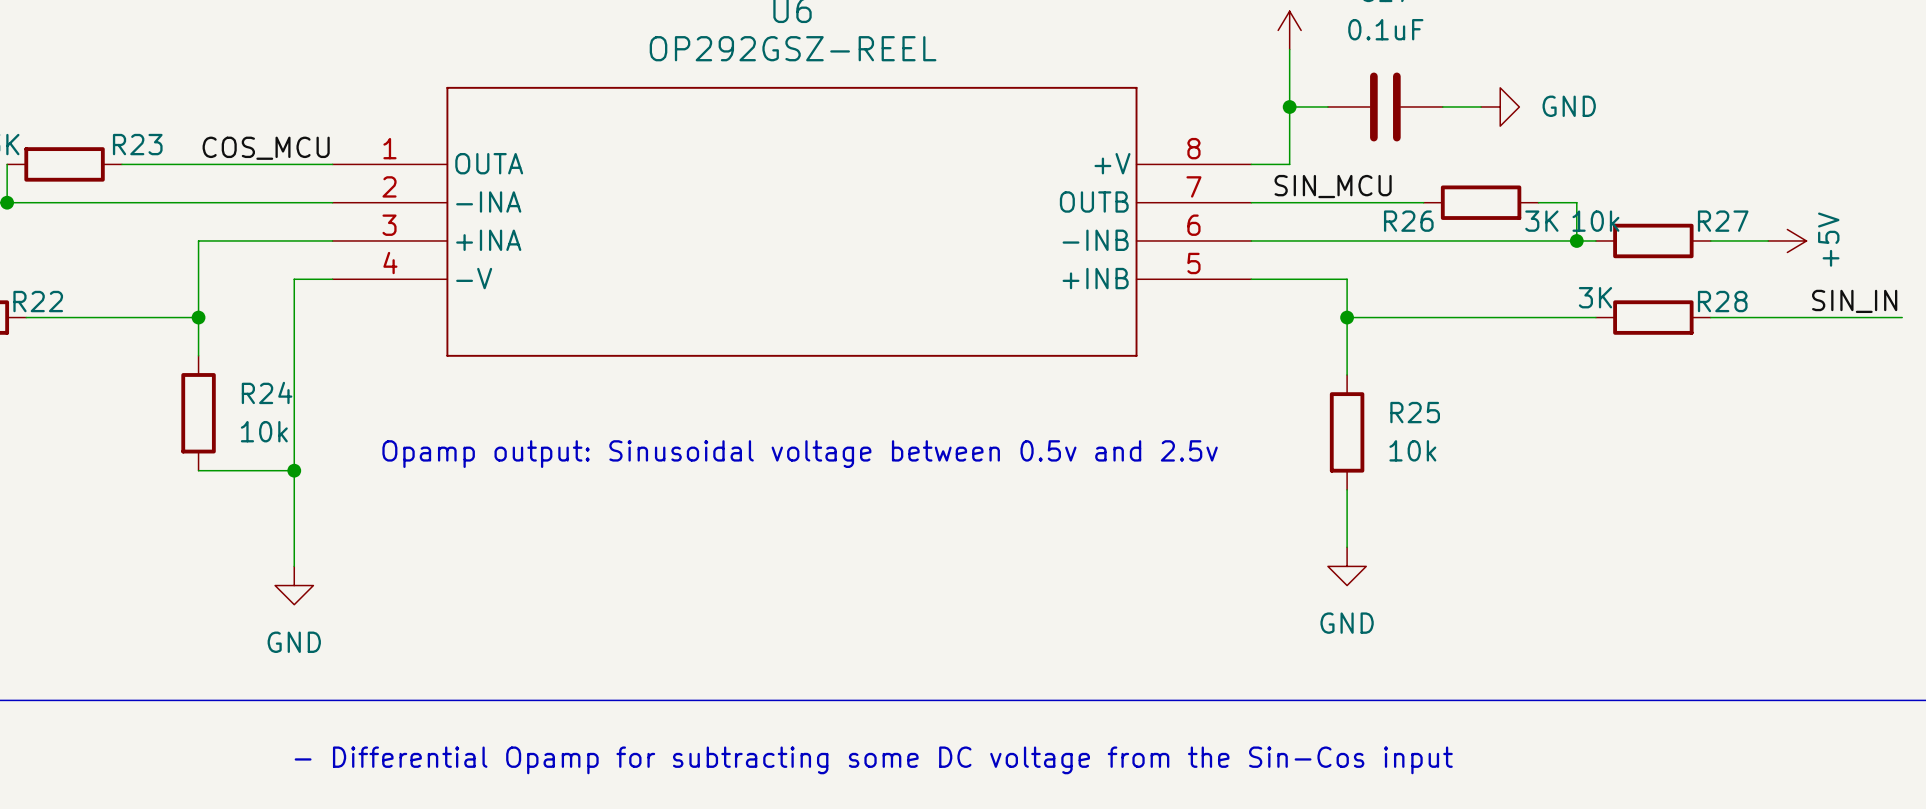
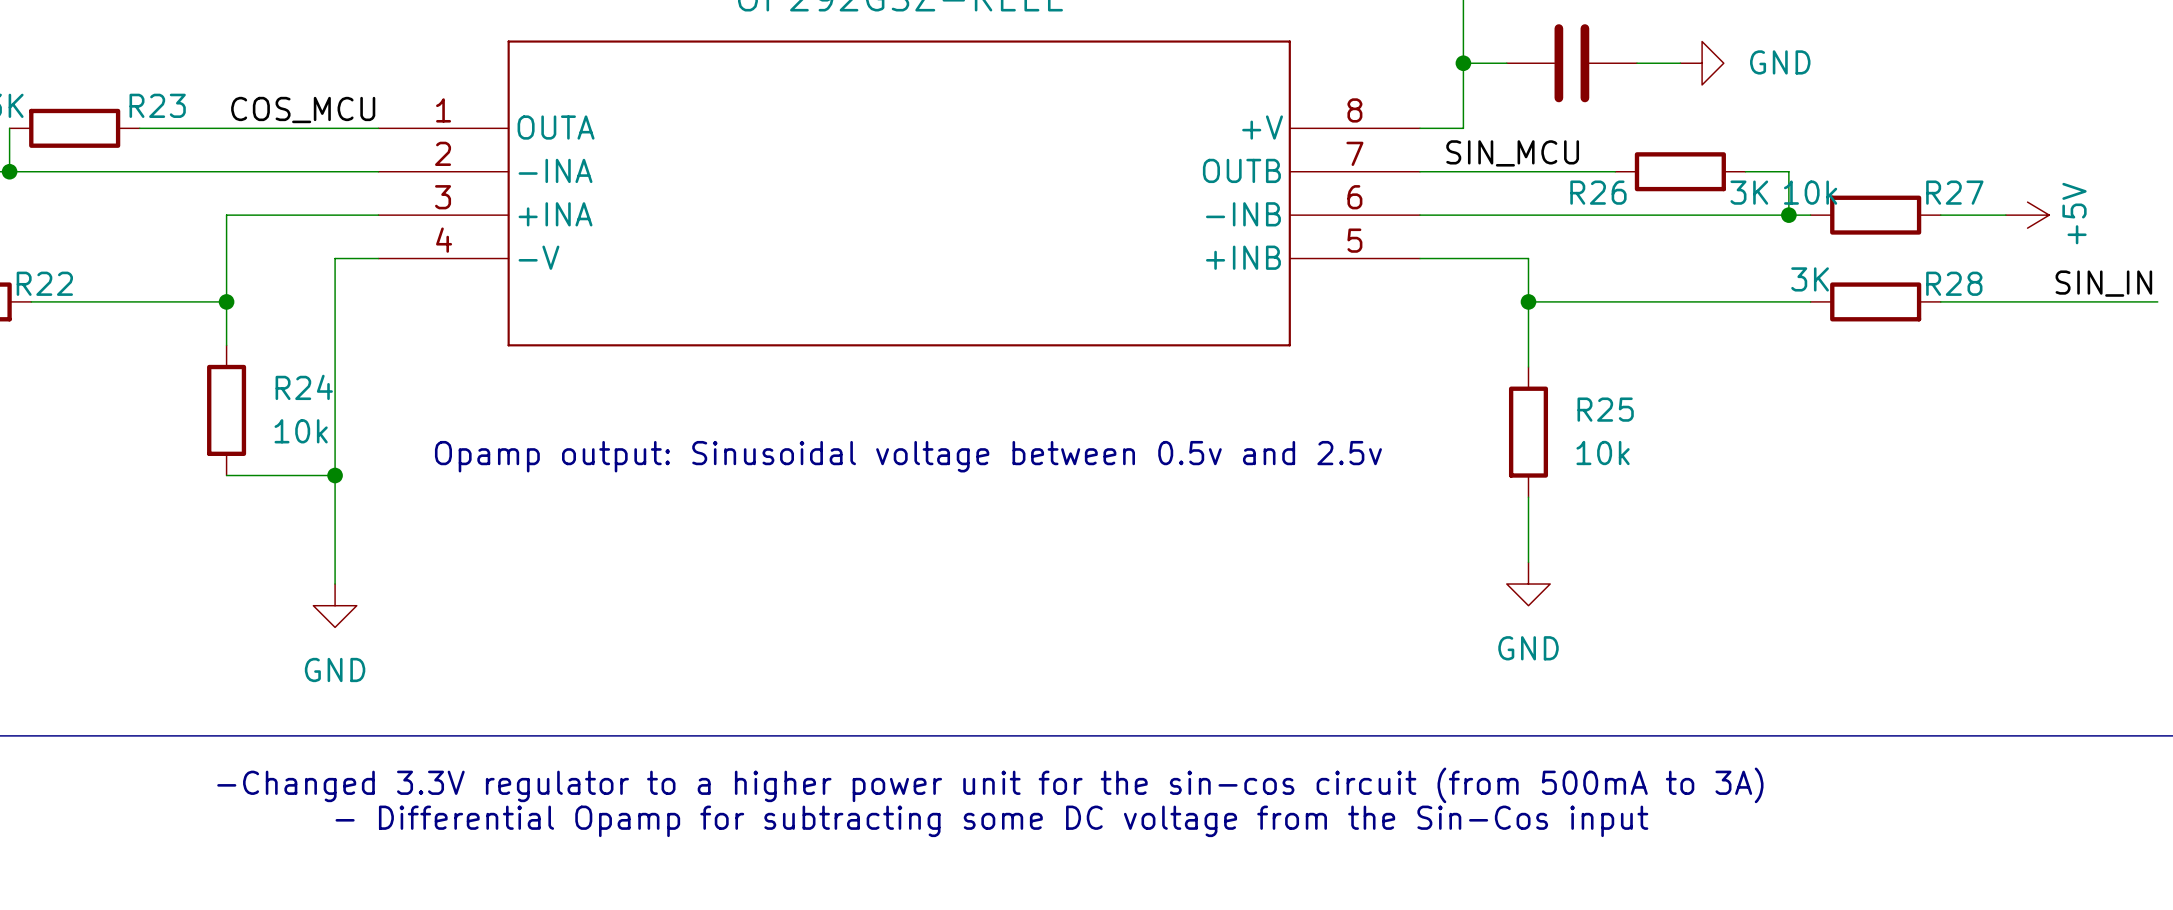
text: none -> -Changed 3.3V regulator to a higher power unit for the sin-cos circuit (from 500mA to 3A) (990, 785)
text position: - Differential Opamp for subtracting some DC voltage from the Sin-Cos input (873, 760) -> - Differential Opamp for subtracting some DC voltage from the Sin-Cos input (991, 821)

